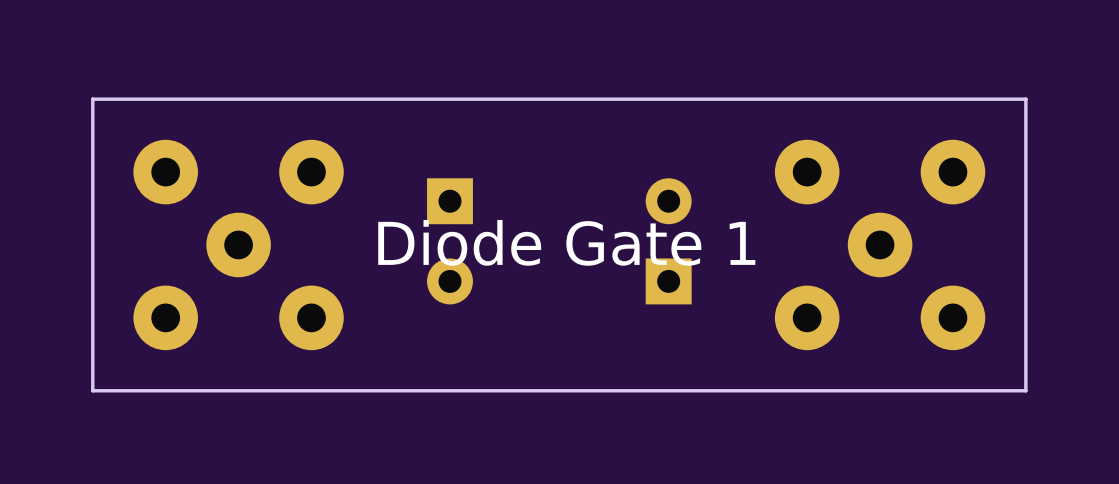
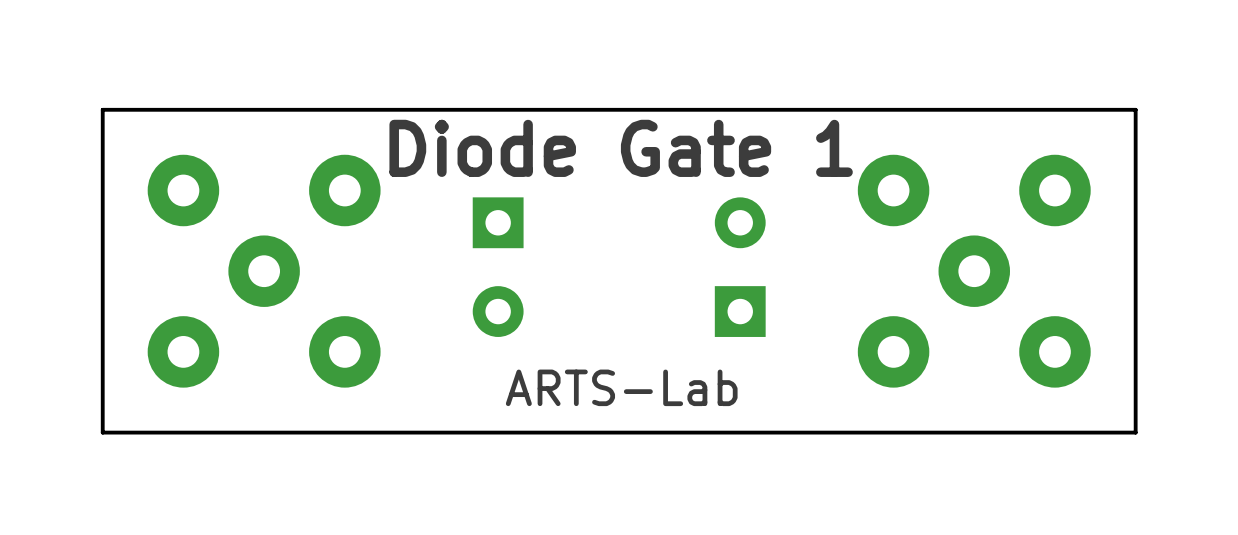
text position: Diode Gate 1 (566, 242) -> Diode Gate 1 (621, 148)
text: none -> ARTS-Lab (621, 387)

